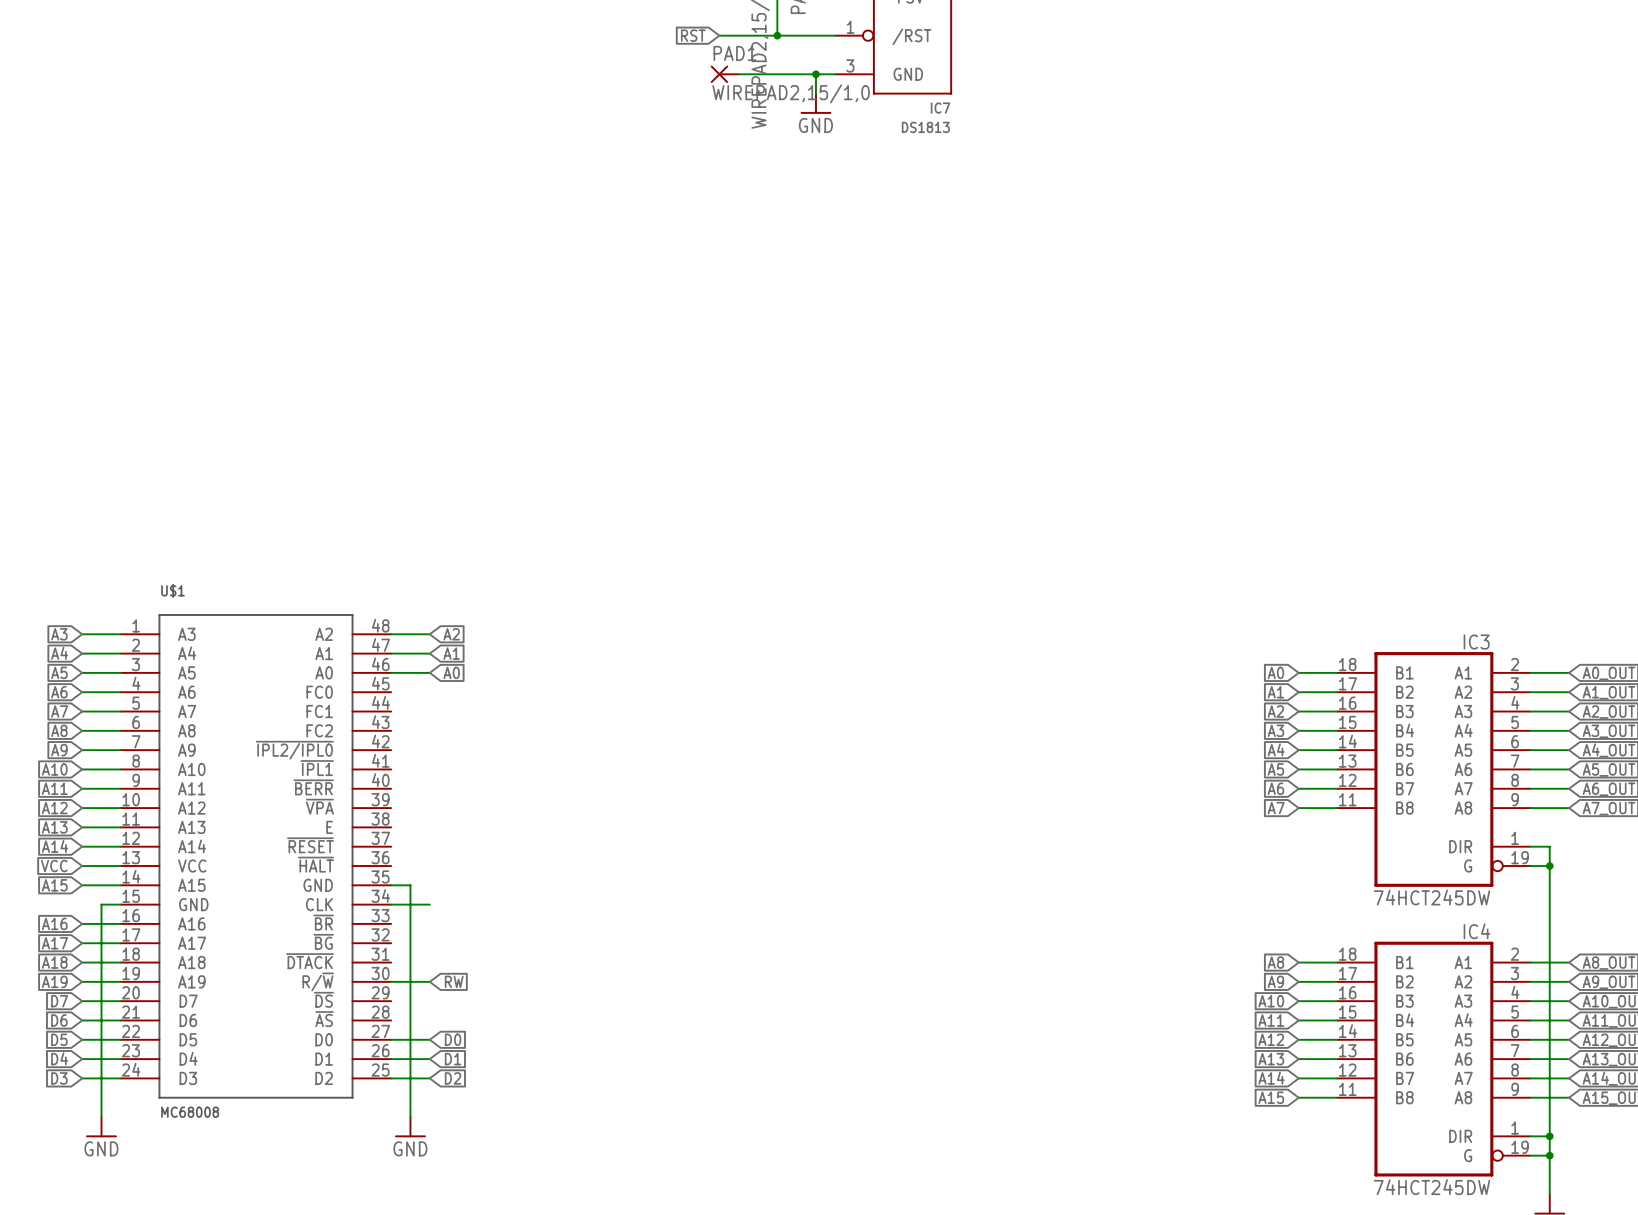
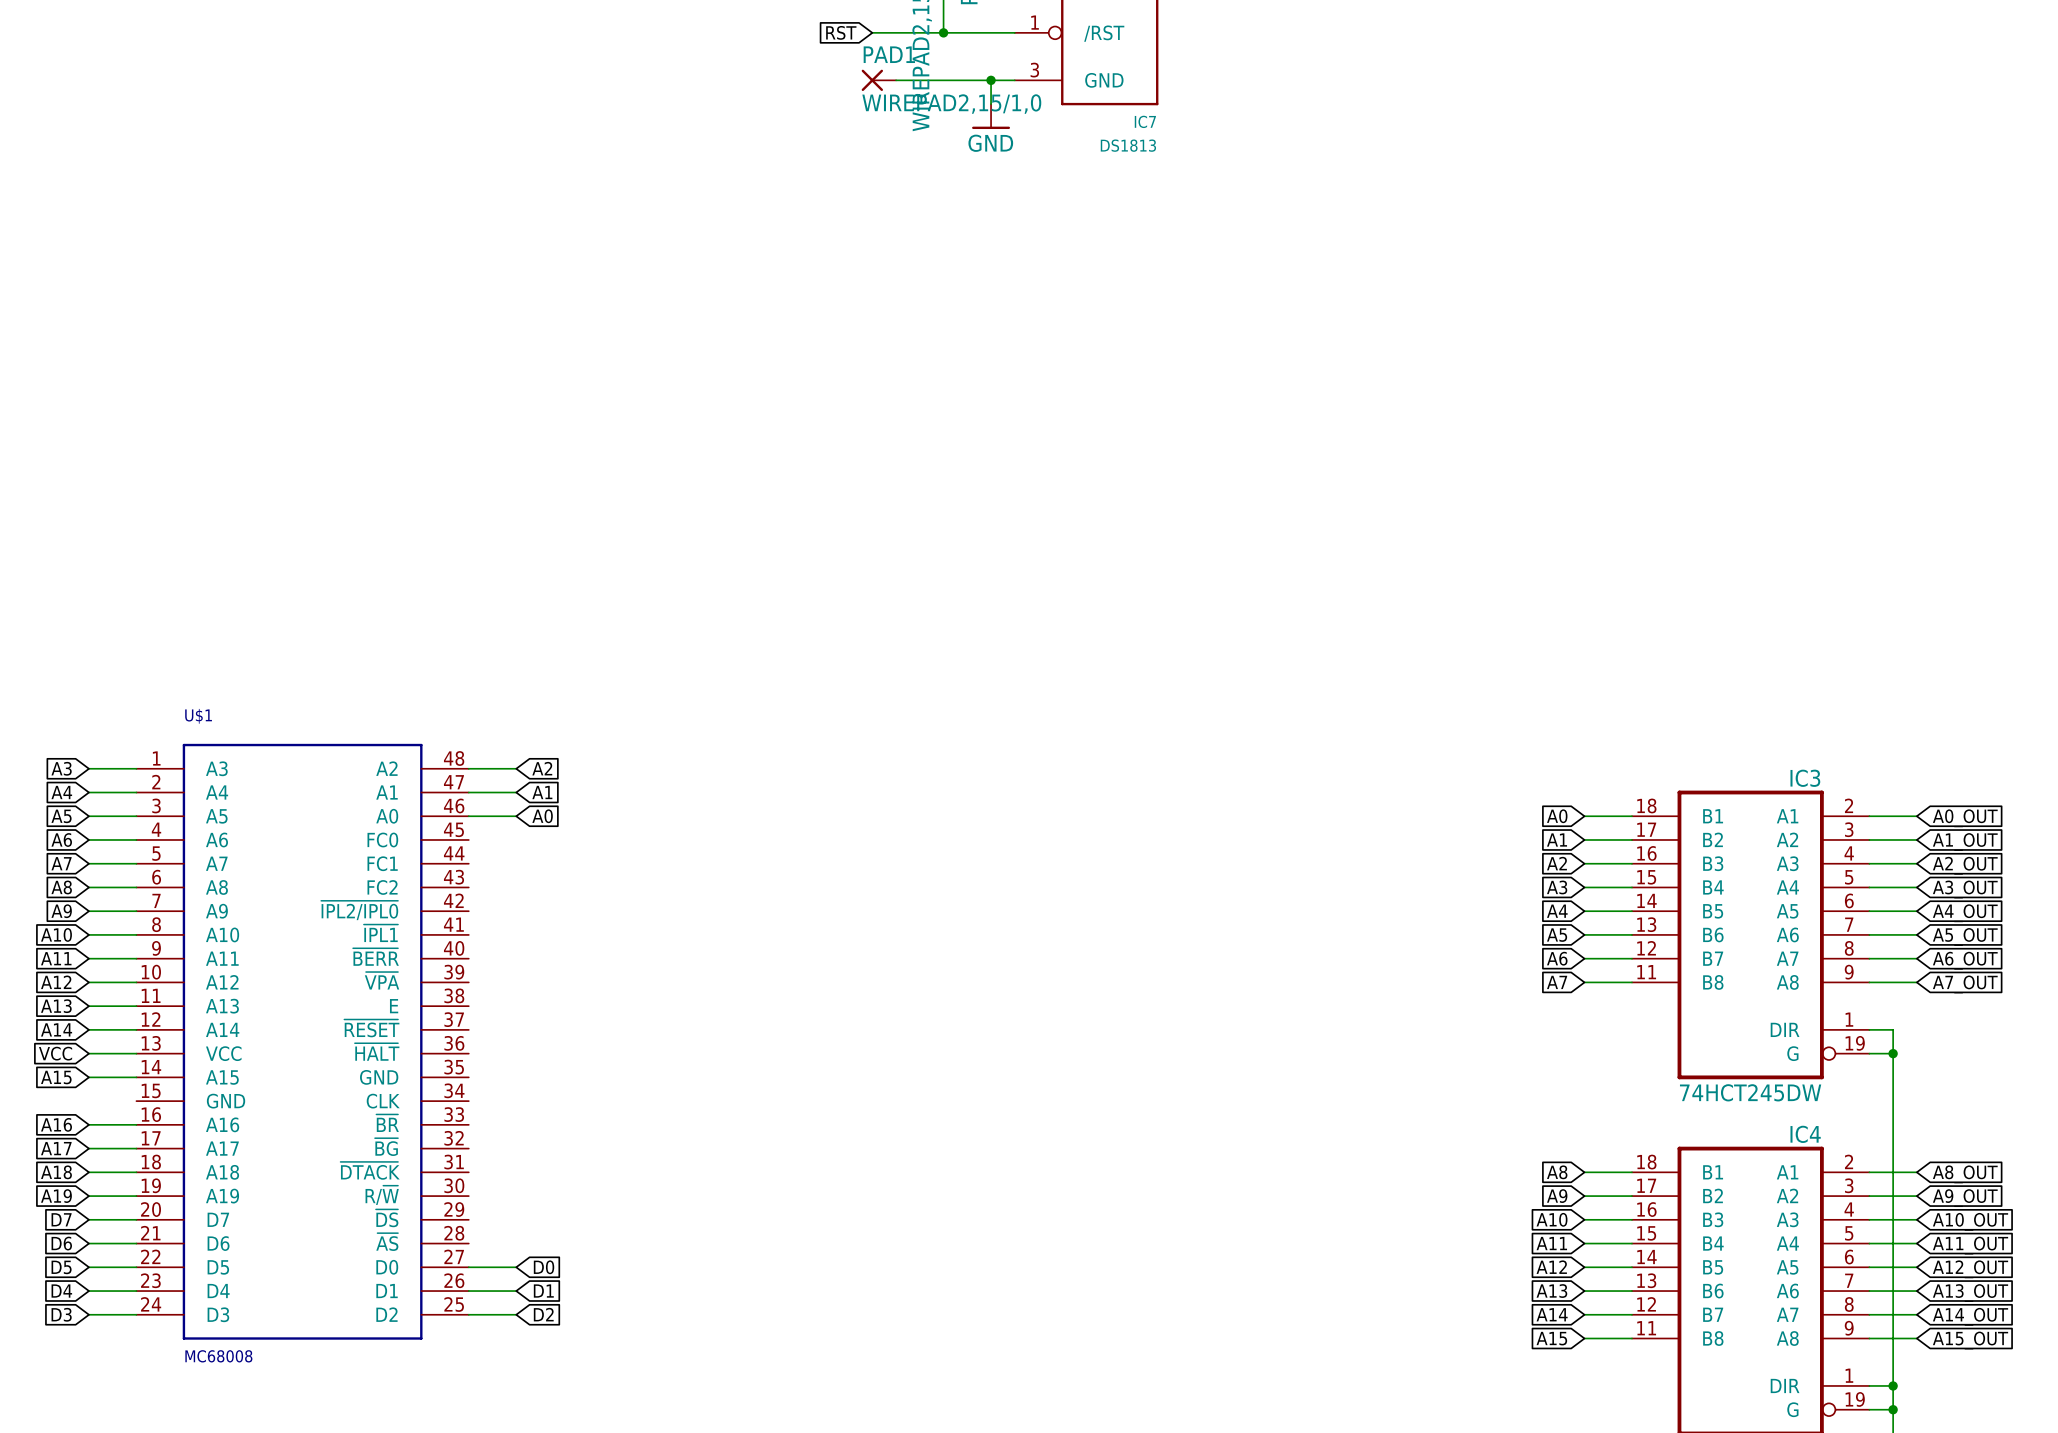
wire: (391, 885) (410, 885) (410, 1117) -> none
wire: (120, 904) (101, 904) (101, 1117) -> none
wire: (391, 904) (429, 904) -> none
wire: (391, 981) (429, 981) -> none
global label: RW (454, 981) -> none
power symbol: GND (101, 1127) -> none
power symbol: GND (410, 1127) -> none

